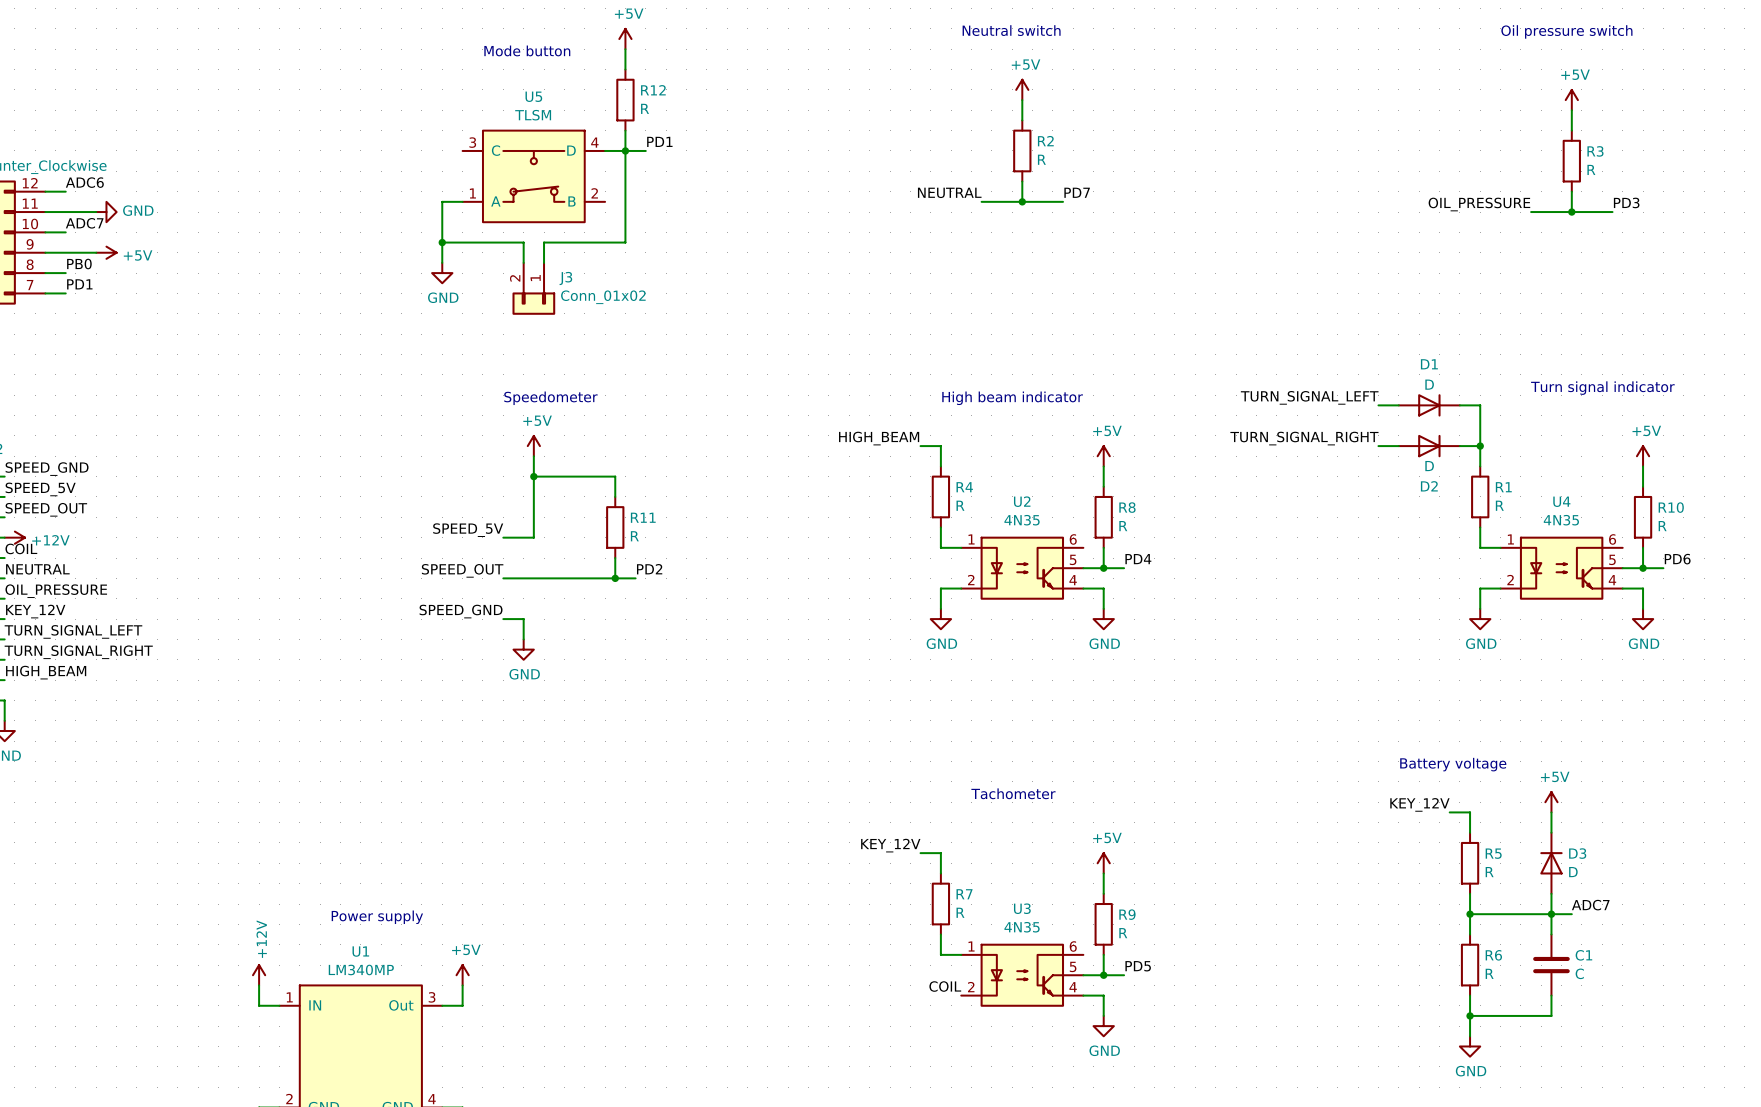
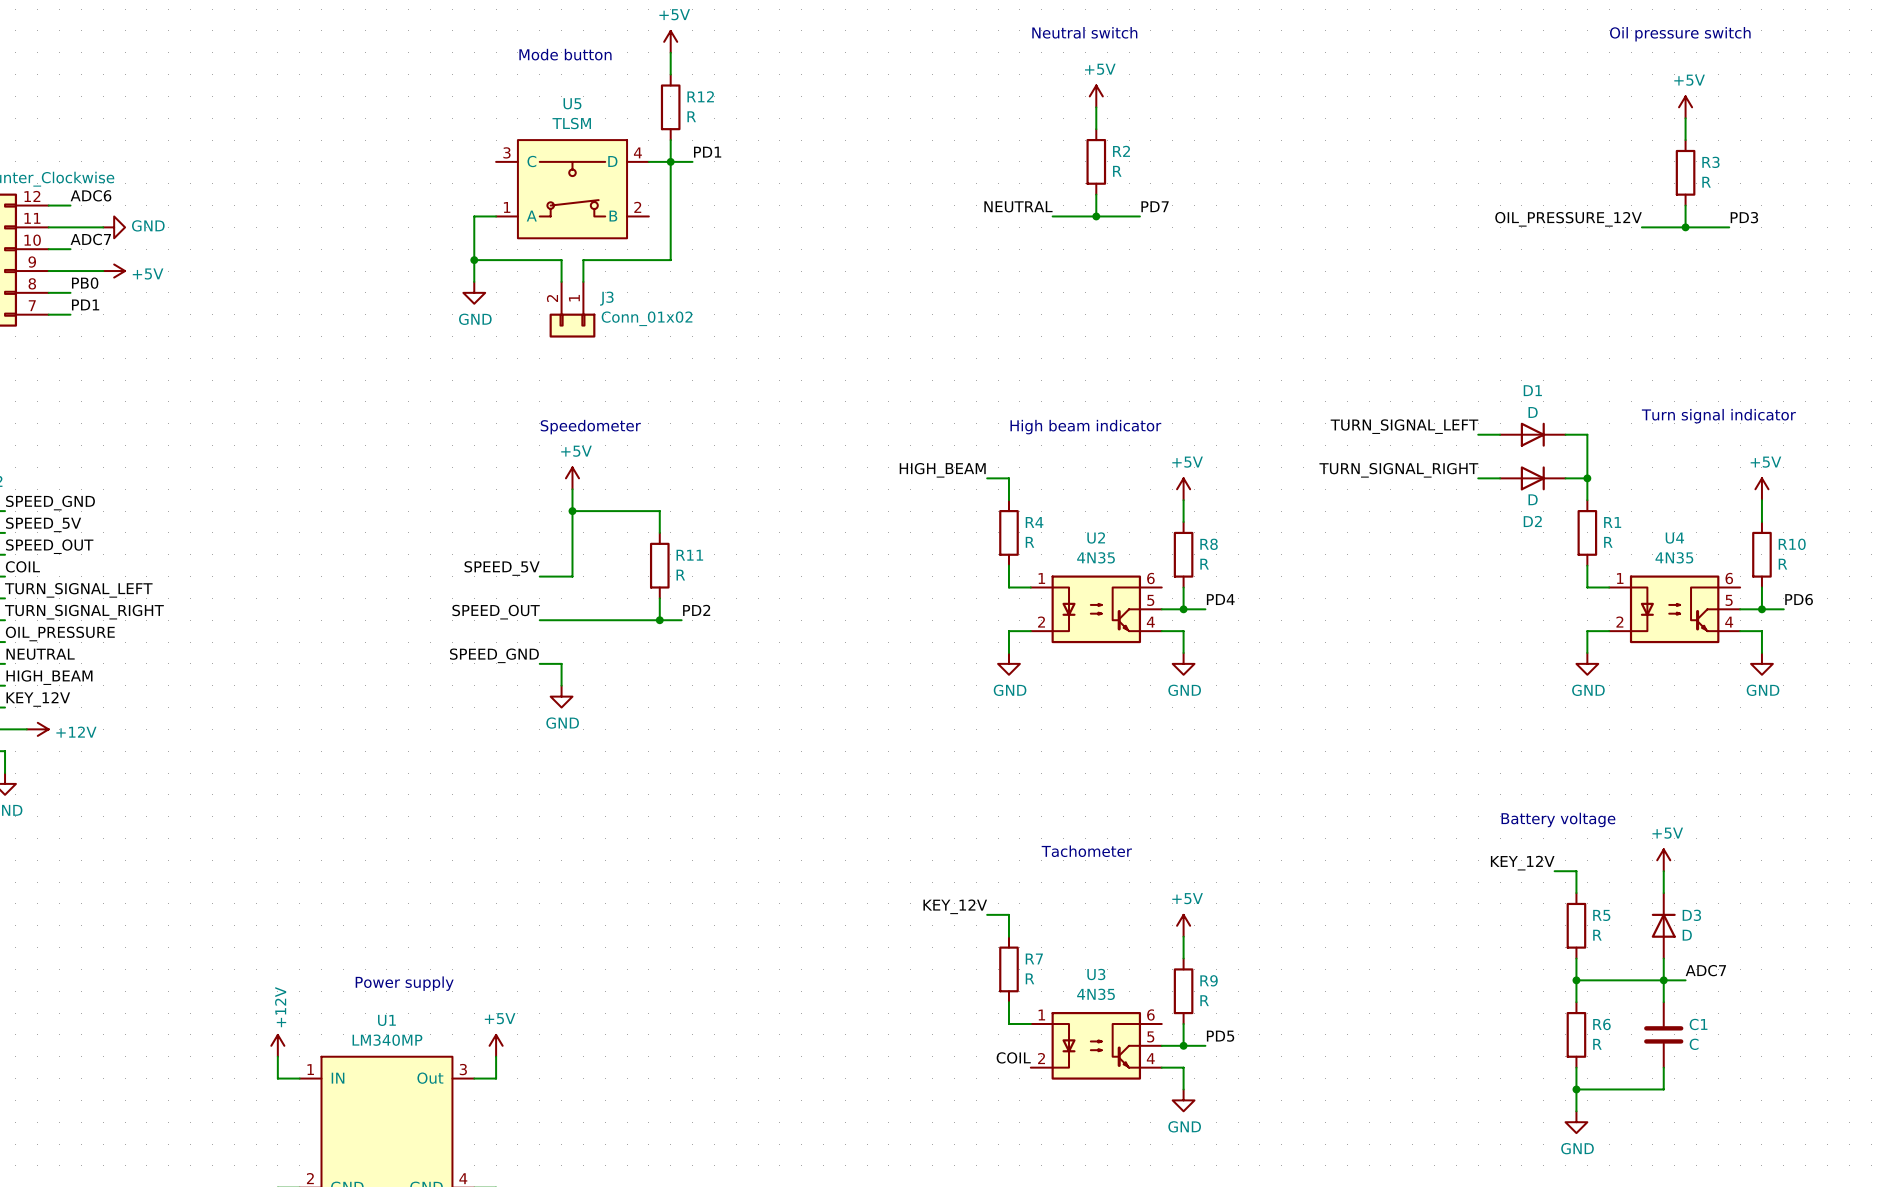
label: OIL_PRESSURE (1479, 204) -> OIL_PRESSURE_12V (1568, 219)
label: none -> COIL (22, 566)
power symbol position: +12V (14, 537) -> +12V (37, 729)
label: COIL (21, 548) -> TURN_SIGNAL_LEFT (78, 590)
label: NEUTRAL (37, 569) -> TURN_SIGNAL_RIGHT (84, 612)
label: KEY_12V (35, 611) -> NEUTRAL (40, 654)
label: TURN_SIGNAL_LEFT (73, 631) -> HIGH_BEAM (49, 677)
label: TURN_SIGNAL_RIGHT (78, 652) -> KEY_12V (38, 699)
label: HIGH_BEAM (46, 672) -> none
wire: none -> (5, 729) (26, 729)

